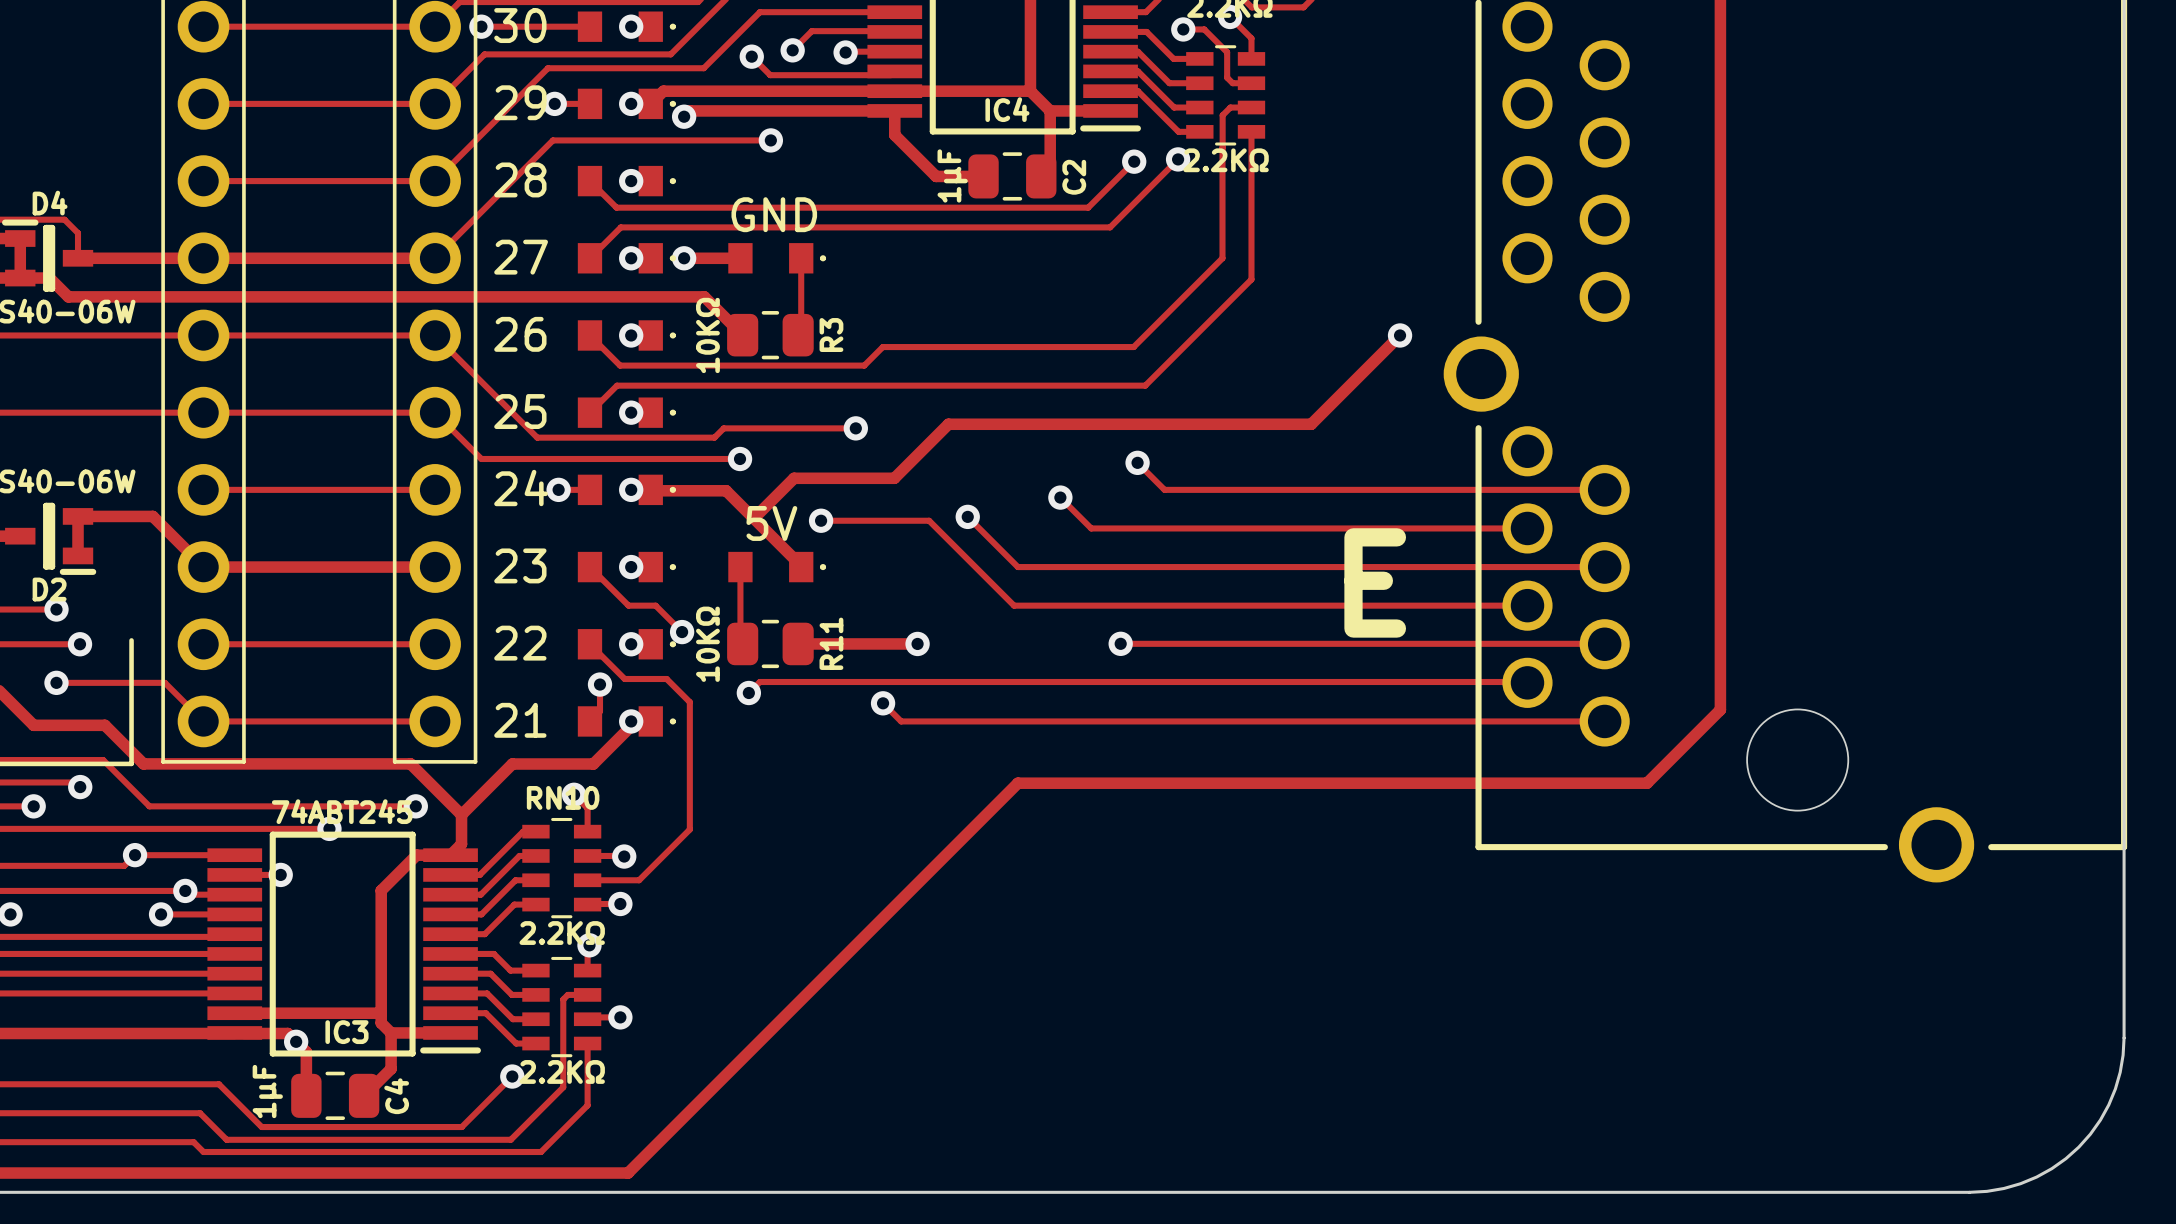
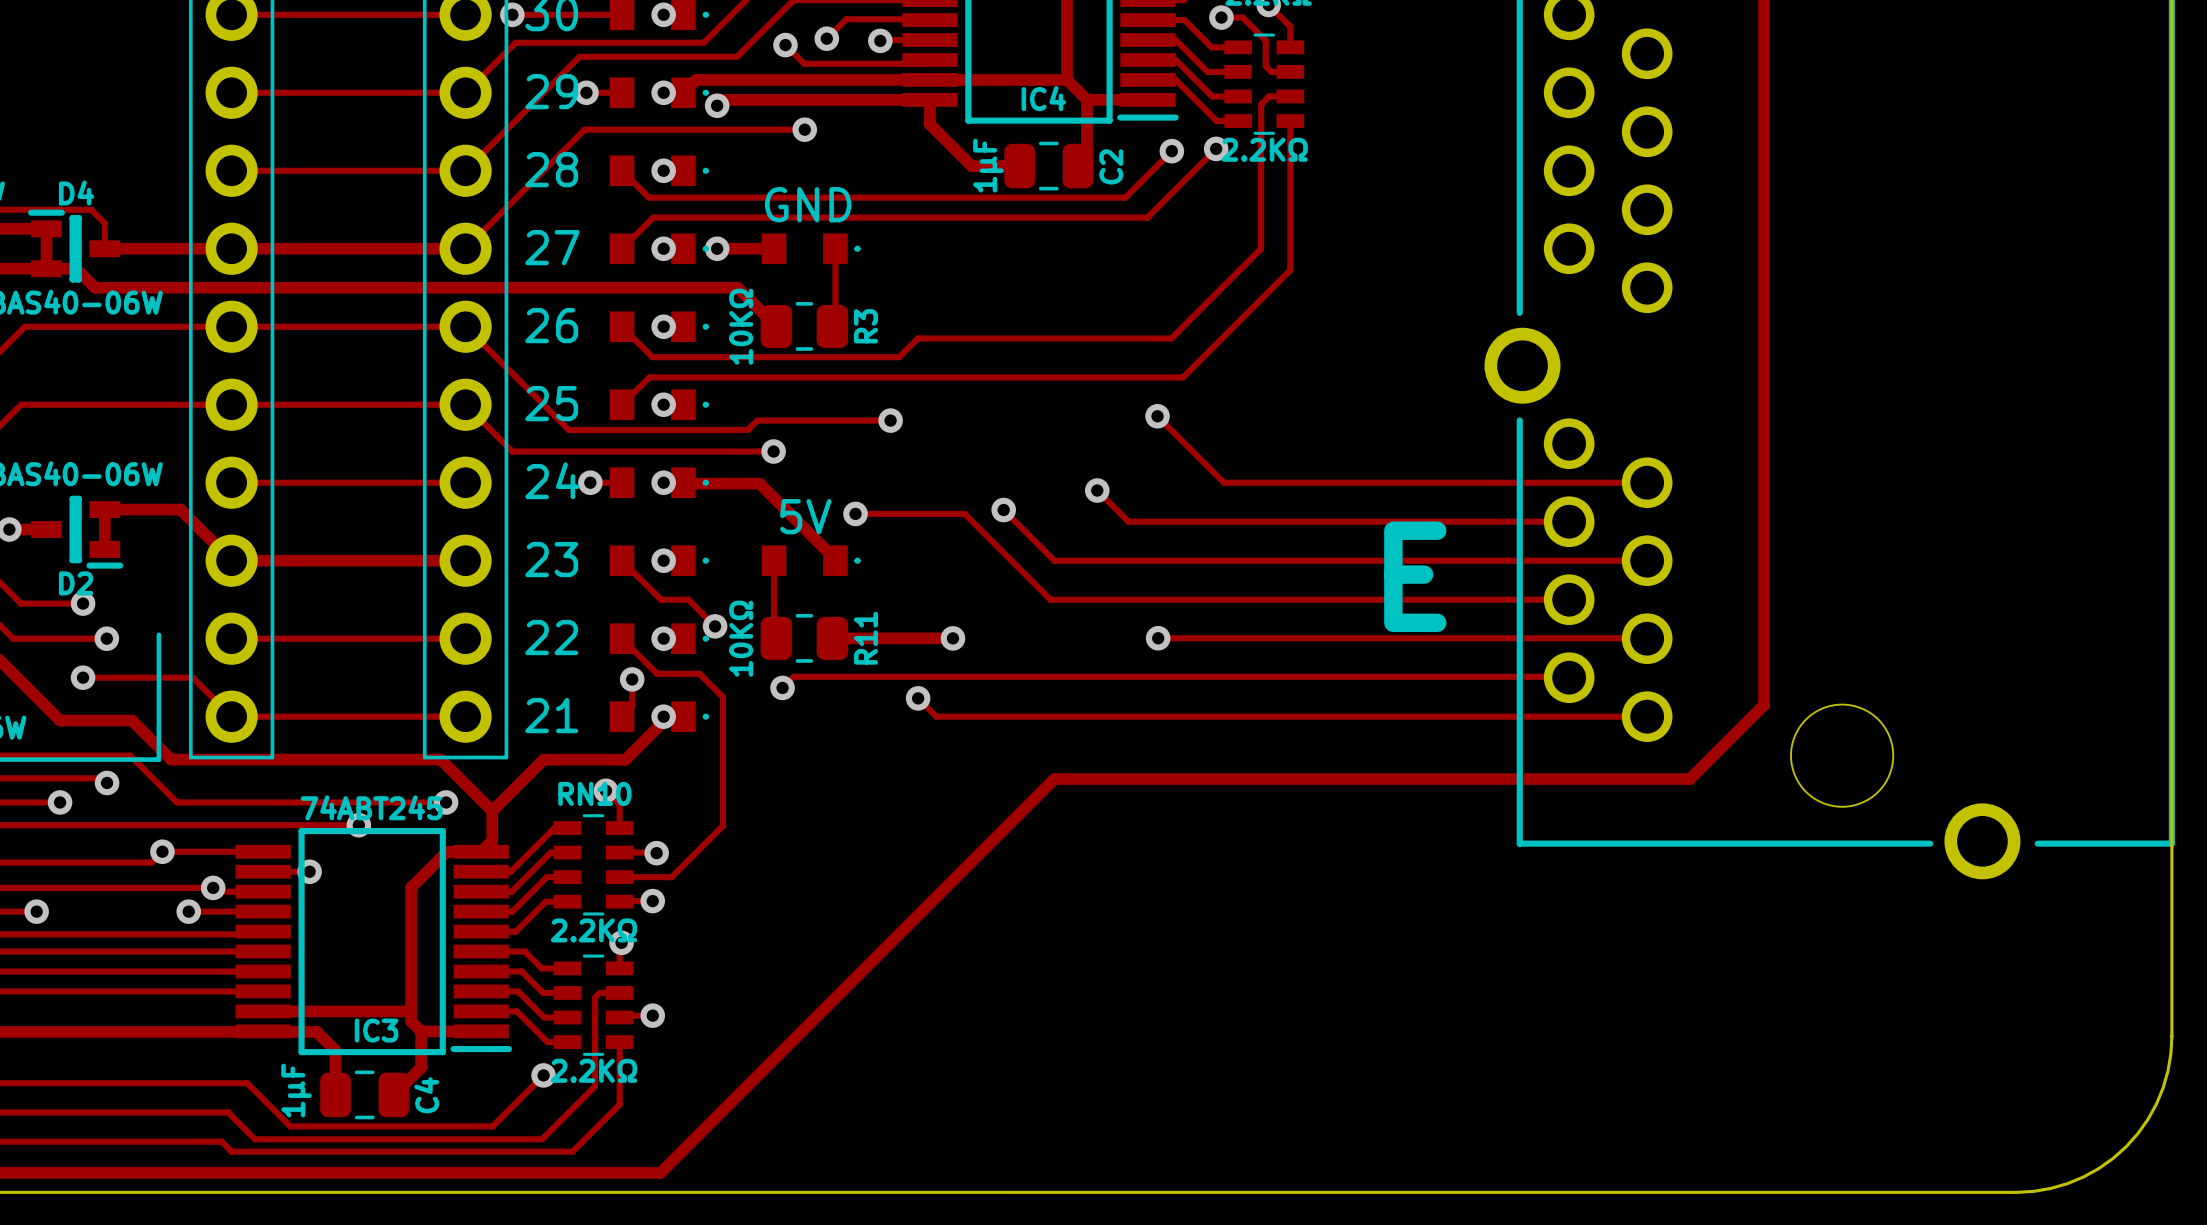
track: (1400, 335) (1311, 424) (948, 424) (894, 478) (794, 478) (753, 518) -> none
via: (1400, 335) -> none
track: (1137, 462) (1164, 489) (1185, 489) -> (1157, 416) (1223, 482)
via position: (1137, 462) -> (1157, 416)
via: (296, 1041) -> none

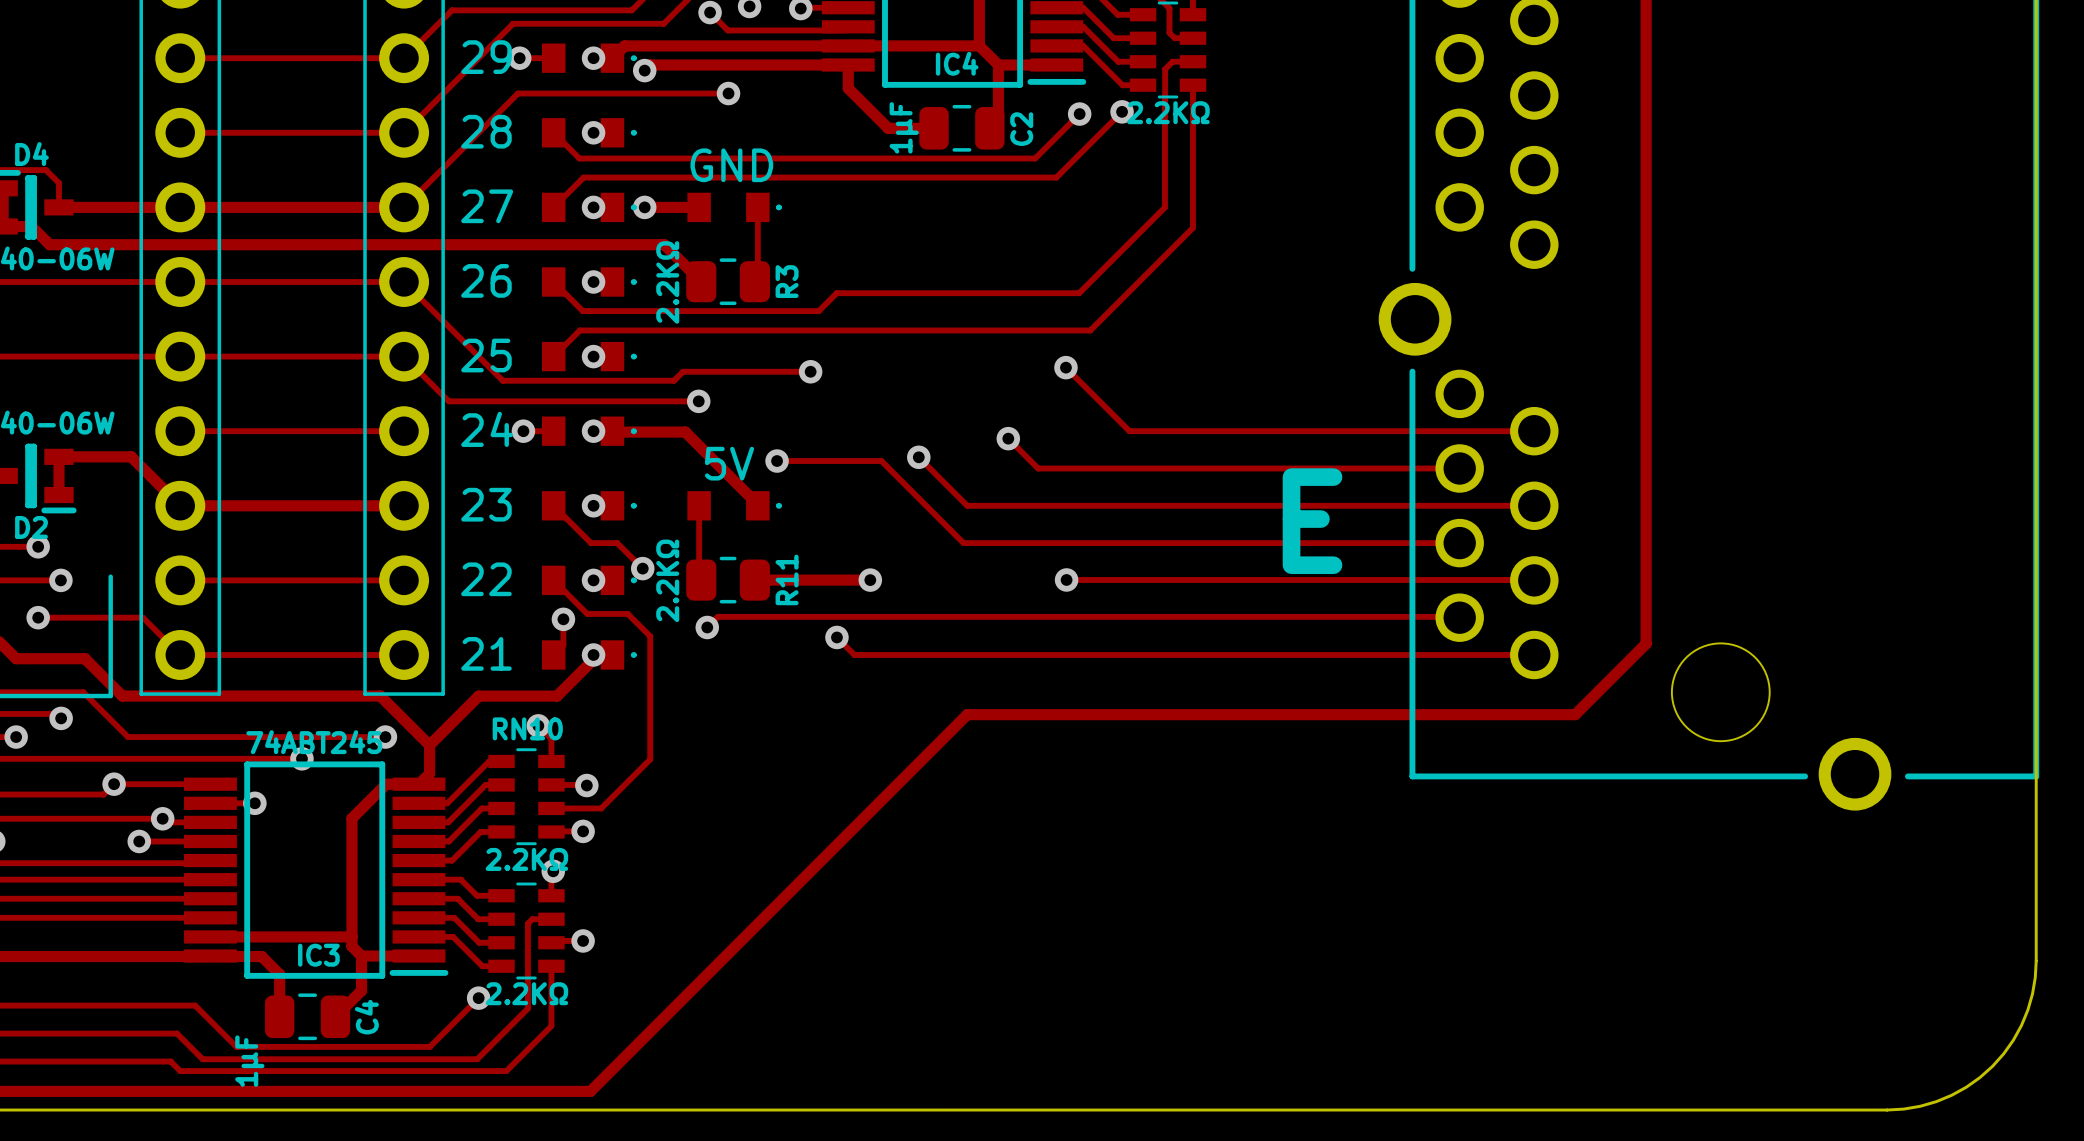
R3 value: 10KΩ (741, 326) -> 2.2KΩ (667, 282)
R11 value: 10KΩ (741, 638) -> 2.2KΩ (667, 580)
C4 value position: 1μF (296, 1090) -> 1μF (249, 1061)

